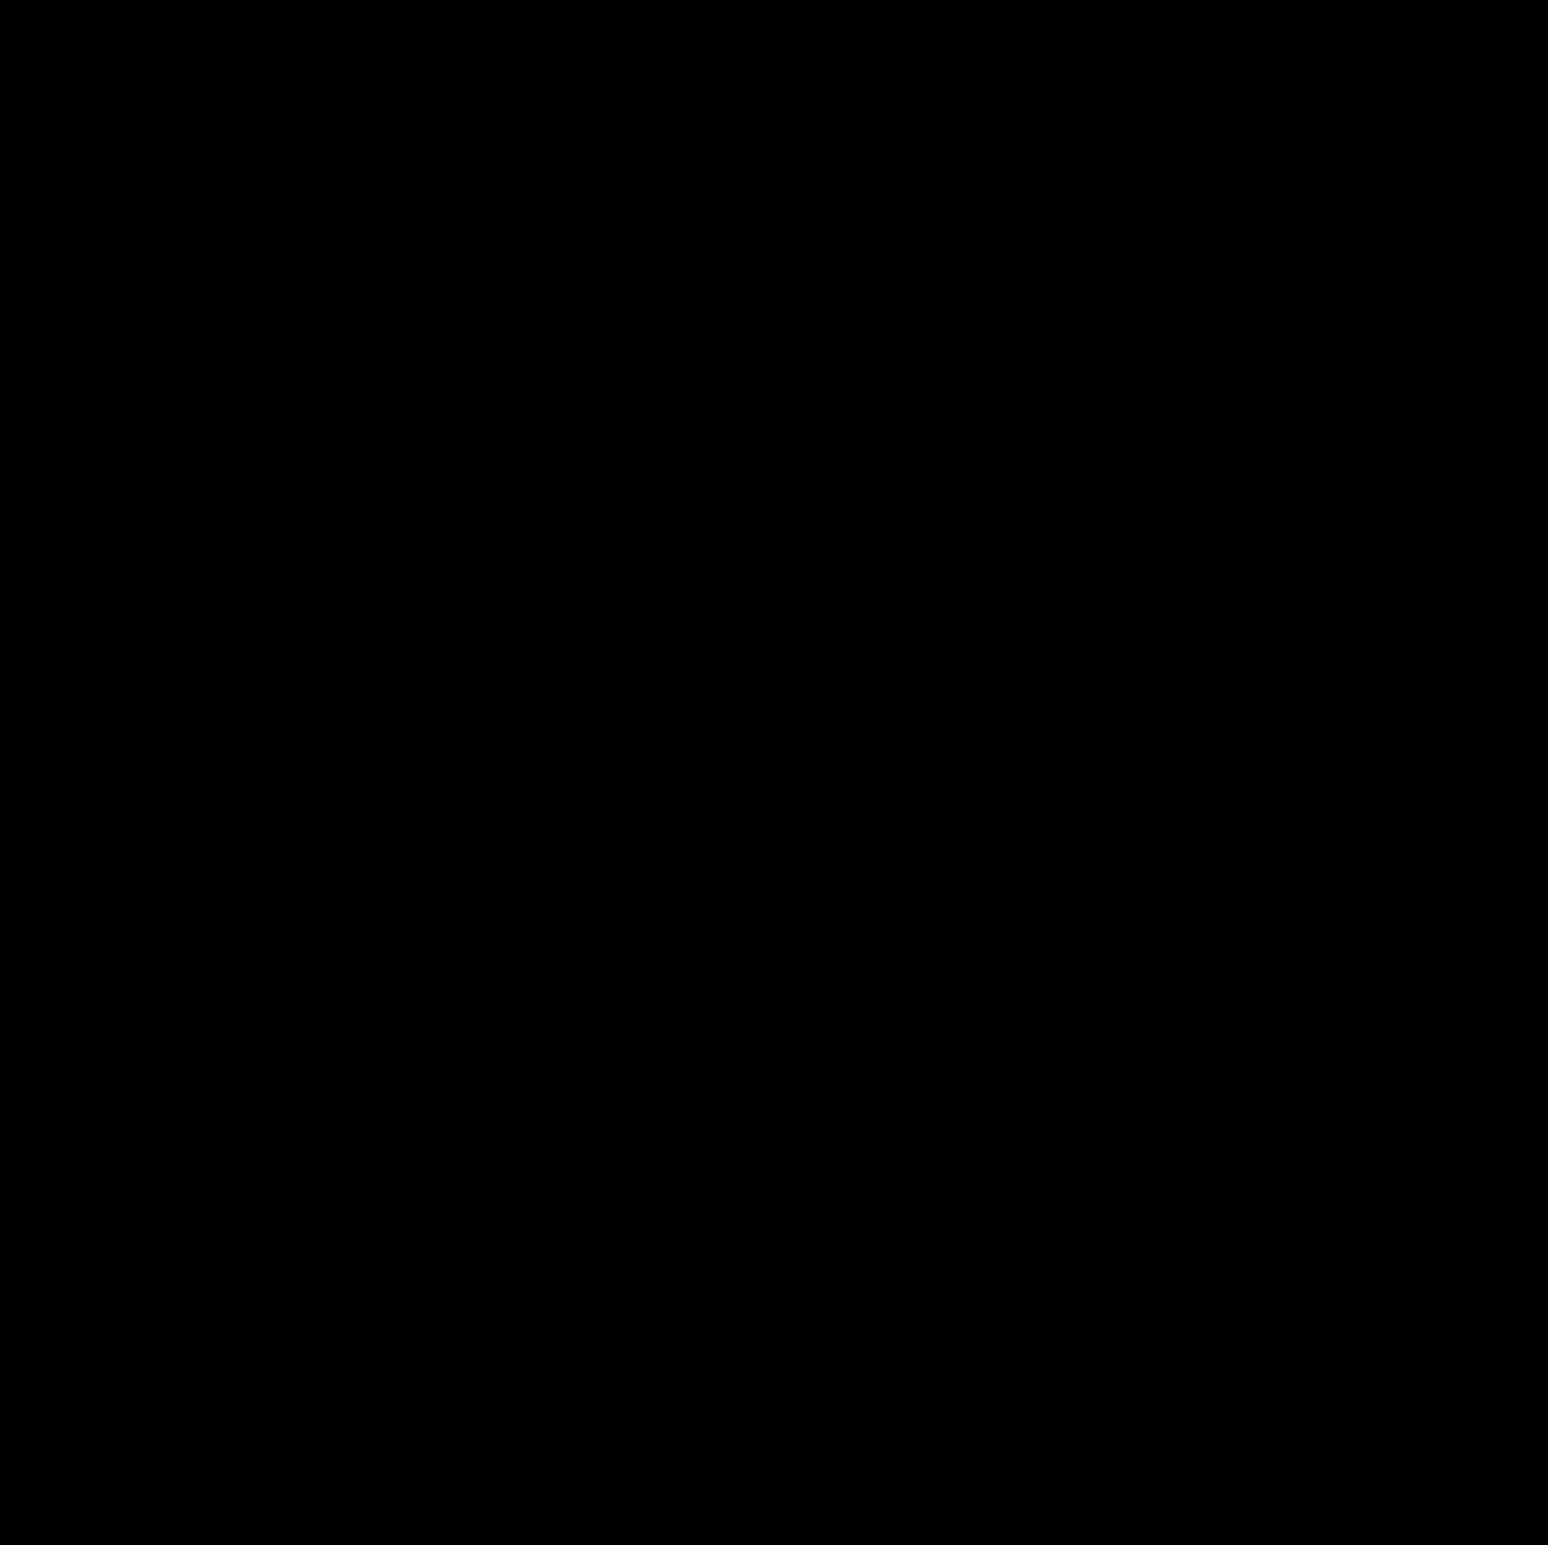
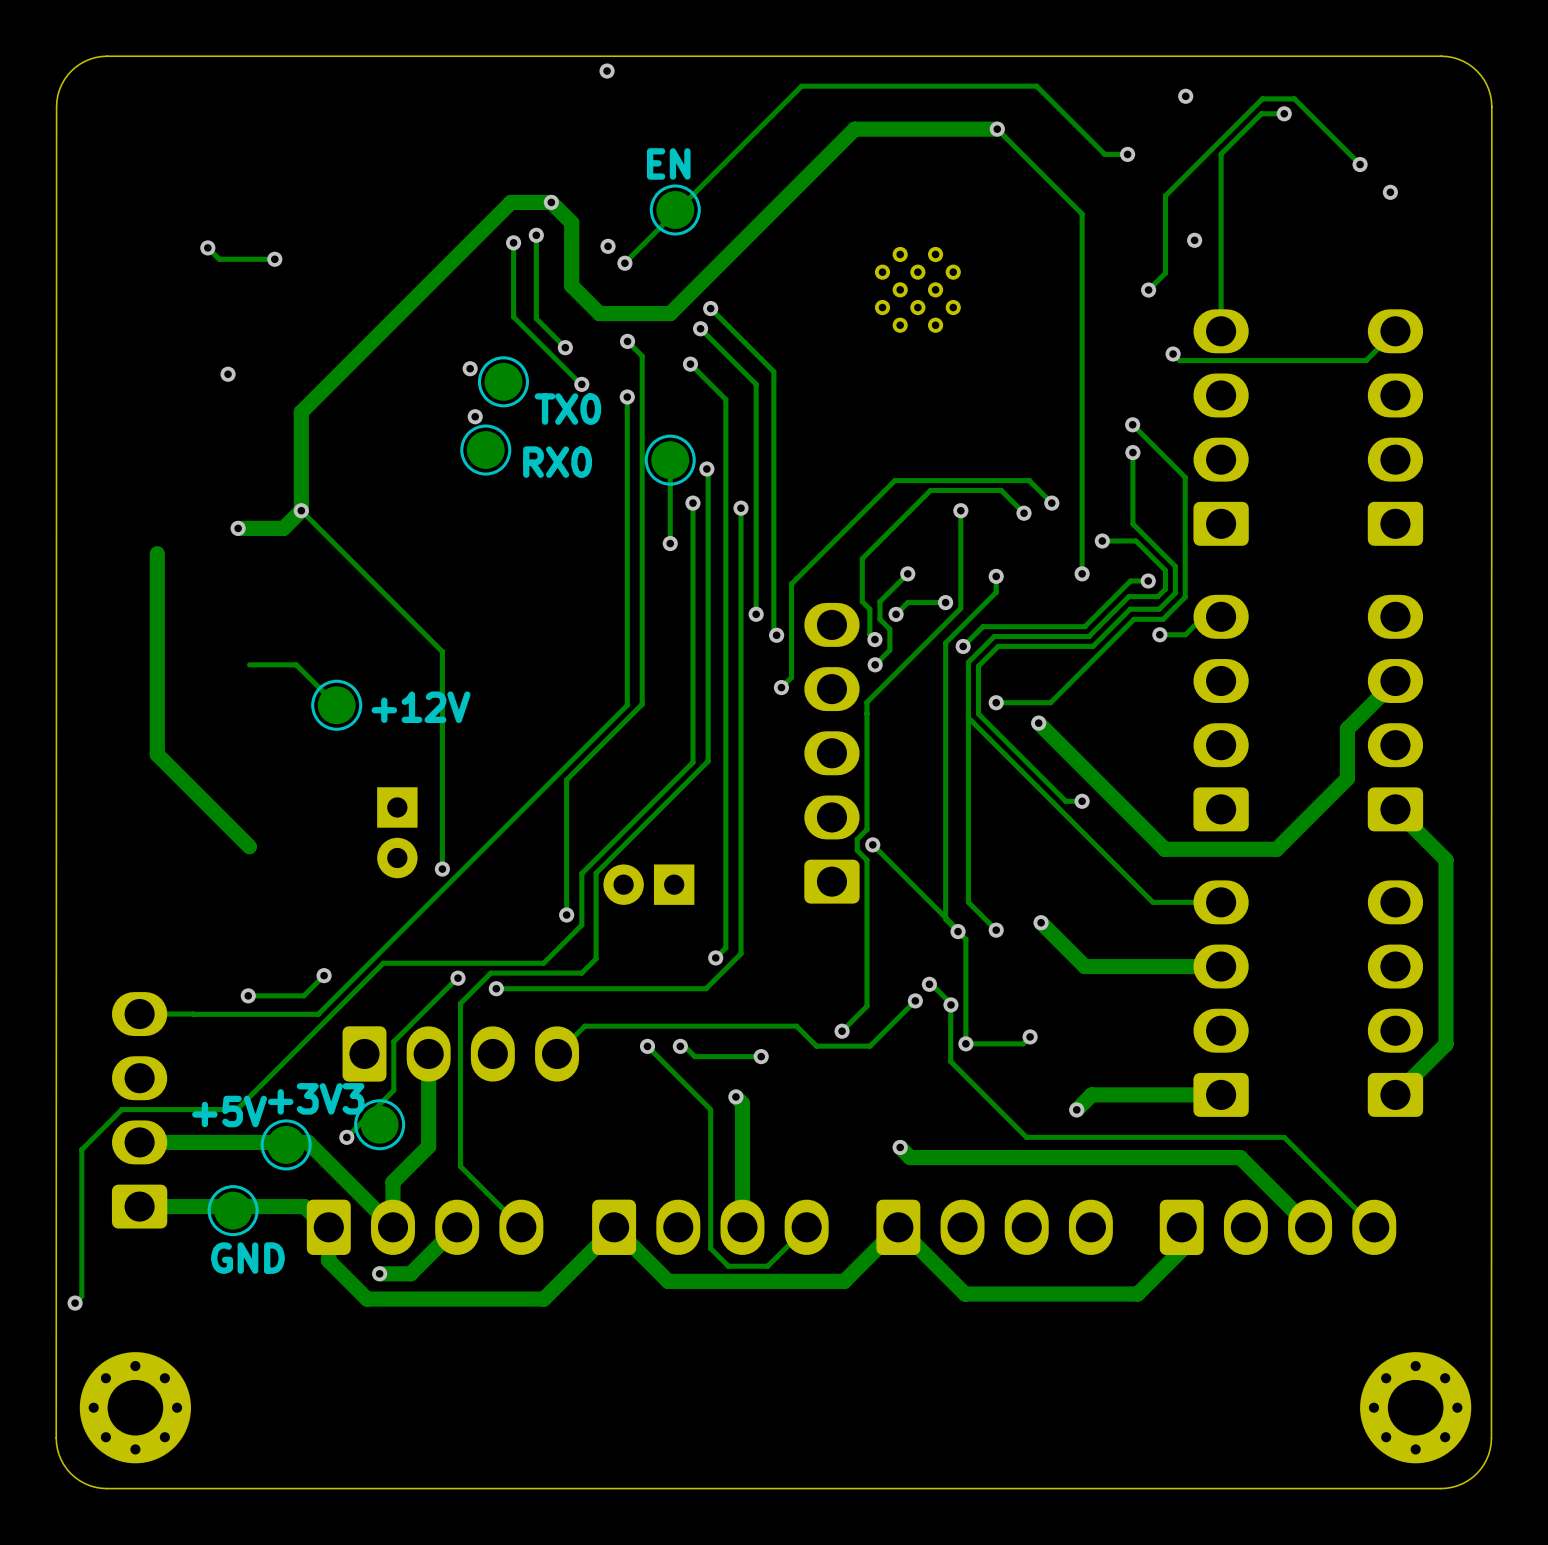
board edge: none -> (1441, 56) (107, 56) (90, 59) (71, 71) (59, 90) (56, 106) (56, 1438) (61, 1459) (71, 1473) (84, 1483) (106, 1488) (1440, 1488) (1457, 1485) (1476, 1473) (1488, 1454) (1491, 1438) (1491, 106) (1488, 90) (1477, 71) (1457, 59) (1441, 56)
via: none -> (607, 71)
via: none -> (1185, 96)
track: none -> (1284, 113) (1261, 113) (1221, 154) (1221, 331)
via: none -> (1284, 113)
via: none -> (997, 129)
track: none -> (1127, 154) (1104, 154) (1036, 86) (801, 86) (624, 262)
via: none -> (1127, 154)
text: none -> EN (668, 163)
track: none -> (1360, 164) (1294, 98) (1262, 98) (1165, 195) (1165, 273) (1148, 290)
via: none -> (1360, 164)
via: none -> (1390, 192)
via: none -> (551, 202)
part: none -> (675, 210)
track: none -> (536, 235) (536, 318) (565, 347)
via: none -> (536, 235)
via: none -> (1194, 240)
track: none -> (513, 242) (513, 317) (581, 384)
via: none -> (513, 242)
via: none -> (608, 246)
track: none -> (207, 247) (219, 259) (274, 259)
via: none -> (207, 247)
via: none -> (274, 259)
via: none -> (624, 263)
part: none -> (917, 289)
via: none -> (1148, 290)
track: none -> (710, 308) (773, 371) (773, 632) (776, 635)
via: none -> (710, 308)
track: none -> (700, 328) (756, 384) (756, 614)
via: none -> (700, 328)
track: none -> (1395, 331) (1366, 360) (1179, 360) (1173, 354)
track: none -> (627, 341) (642, 356) (642, 704) (566, 779) (566, 914)
via: none -> (627, 341)
via: none -> (565, 347)
via: none -> (1173, 354)
track: none -> (690, 364) (725, 399) (725, 947) (715, 957)
via: none -> (690, 364)
via: none -> (470, 368)
via: none -> (228, 374)
part: none -> (503, 381)
via: none -> (581, 384)
track: none -> (627, 396) (627, 705) (318, 1014) (193, 1014)
via: none -> (627, 396)
text: none -> TX0 (567, 409)
via: none -> (475, 416)
track: none -> (1132, 424) (1185, 477) (1185, 597) (1163, 619) (1134, 619) (1050, 702) (996, 702)
via: none -> (1132, 424)
part: none -> (1221, 427)
part: none -> (1395, 427)
part: none -> (485, 450)
track: none -> (1132, 452) (1132, 523) (1175, 566) (1175, 593) (1159, 609) (1130, 609) (1093, 646) (998, 646) (978, 666) (978, 714) (1065, 801) (1082, 801)
via: none -> (1132, 452)
track: none -> (670, 460) (670, 543)
part: none -> (670, 460)
text: none -> RX0 (557, 462)
track: none -> (706, 469) (708, 761) (596, 873) (596, 958) (581, 973) (490, 973) (460, 1003) (460, 1166) (521, 1227)
via: none -> (706, 469)
track: none -> (692, 503) (692, 762) (581, 873) (581, 925) (543, 963) (383, 963) (238, 1109) (121, 1109) (81, 1149) (81, 1296) (75, 1303)
via: none -> (692, 503)
track: none -> (1051, 503) (1029, 480) (894, 480) (791, 583) (791, 677) (781, 687)
via: none -> (1051, 503)
track: none -> (741, 508) (741, 953) (706, 988) (496, 988)
via: none -> (741, 508)
track: none -> (301, 510) (301, 412) (511, 202) (551, 202) (571, 222) (571, 285) (599, 313) (670, 313) (854, 129) (997, 129) (1082, 213) (1082, 573)
track: none -> (301, 510) (283, 528) (238, 528)
track: none -> (301, 510) (442, 651) (442, 869)
via: none -> (301, 510)
track: none -> (960, 510) (960, 608) (866, 702) (866, 829) (857, 839) (857, 850) (866, 860) (866, 1006) (842, 1031)
via: none -> (960, 510)
track: none -> (1024, 513) (1001, 490) (930, 490) (862, 558) (862, 601) (869, 609) (869, 634) (874, 639)
via: none -> (1024, 513)
via: none -> (238, 528)
track: none -> (1102, 541) (1136, 541) (1165, 570) (1165, 589) (1157, 596) (1128, 596) (1088, 636) (994, 636) (968, 662) (968, 902) (996, 930)
via: none -> (1102, 541)
via: none -> (670, 543)
track: none -> (157, 553) (157, 754) (249, 846)
track: none -> (907, 573) (879, 601) (879, 619) (889, 629) (889, 650) (875, 664)
via: none -> (907, 573)
via: none -> (1082, 573)
track: none -> (996, 576) (996, 592) (945, 642) (945, 919) (965, 939) (965, 1043) (1023, 1043) (1030, 1036)
via: none -> (996, 576)
track: none -> (1148, 581) (1130, 581) (1084, 626) (982, 626) (963, 646)
via: none -> (1148, 581)
track: none -> (945, 602) (907, 602) (896, 614)
via: none -> (945, 602)
via: none -> (756, 614)
via: none -> (896, 614)
track: none -> (1221, 616) (1203, 616) (1185, 634) (1159, 634)
via: none -> (1159, 634)
via: none -> (776, 635)
via: none -> (874, 639)
via: none -> (963, 646)
track: none -> (249, 664) (296, 664) (336, 705)
via: none -> (875, 664)
track: none -> (1395, 681) (1347, 729) (1347, 778) (1276, 849) (1164, 849) (1038, 723)
via: none -> (781, 687)
via: none -> (996, 702)
part: none -> (336, 705)
text: none -> +12V (421, 707)
part: none -> (1221, 713)
part: none -> (1395, 713)
track: none -> (968, 717) (1152, 902) (1221, 902)
via: none -> (1038, 723)
part: none -> (831, 753)
via: none -> (1082, 801)
track: none -> (1395, 809) (1445, 859) (1445, 1044) (1395, 1094)
part: none -> (397, 832)
track: none -> (872, 844) (958, 931)
via: none -> (872, 844)
via: none -> (442, 869)
part: none -> (648, 884)
via: none -> (566, 914)
track: none -> (1041, 922) (1084, 966) (1221, 966)
via: none -> (1041, 922)
via: none -> (996, 930)
via: none -> (958, 931)
via: none -> (715, 957)
track: none -> (324, 975) (303, 995) (248, 995)
via: none -> (324, 975)
track: none -> (457, 978) (393, 1041) (393, 1090) (346, 1137)
via: none -> (457, 978)
track: none -> (929, 984) (950, 1003) (950, 1061) (1026, 1137) (1284, 1137) (1372, 1225) (1375, 1225)
via: none -> (929, 984)
via: none -> (496, 988)
via: none -> (248, 995)
part: none -> (1221, 998)
part: none -> (1395, 998)
track: none -> (915, 1000) (870, 1046) (816, 1046) (796, 1026) (584, 1026) (557, 1053)
via: none -> (915, 1000)
via: none -> (950, 1004)
track: none -> (193, 1014) (139, 1014)
via: none -> (842, 1031)
via: none -> (1030, 1036)
via: none -> (965, 1043)
track: none -> (647, 1046) (710, 1109) (710, 1248) (728, 1266) (767, 1266) (806, 1227)
via: none -> (647, 1046)
track: none -> (680, 1046) (684, 1046) (694, 1056) (761, 1056)
via: none -> (680, 1046)
track: none -> (428, 1053) (428, 1146) (392, 1182) (392, 1227) (308, 1142) (139, 1142)
part: none -> (460, 1053)
via: none -> (761, 1056)
track: none -> (1221, 1094) (1091, 1094) (1076, 1109)
track: none -> (735, 1096) (742, 1103) (742, 1227)
via: none -> (735, 1096)
text: none -> +3V3 (316, 1098)
via: none -> (1076, 1109)
part: none -> (139, 1110)
text: none -> +5V (229, 1111)
part: none -> (379, 1124)
via: none -> (346, 1137)
part: none -> (286, 1144)
track: none -> (900, 1147) (910, 1157) (1240, 1157) (1310, 1227)
via: none -> (900, 1147)
track: none -> (139, 1206) (304, 1206) (325, 1227) (328, 1227) (328, 1260) (367, 1299) (543, 1299) (614, 1227) (668, 1281) (844, 1281) (898, 1227) (965, 1294) (1137, 1294) (1181, 1250) (1181, 1227)
part: none -> (233, 1210)
part: none -> (425, 1227)
track: none -> (457, 1227) (410, 1273) (379, 1273)
part: none -> (710, 1227)
part: none -> (994, 1227)
part: none -> (1277, 1227)
text: none -> GND (247, 1258)
via: none -> (379, 1273)
via: none -> (75, 1303)
part: none -> (135, 1407)
part: none -> (1415, 1407)

